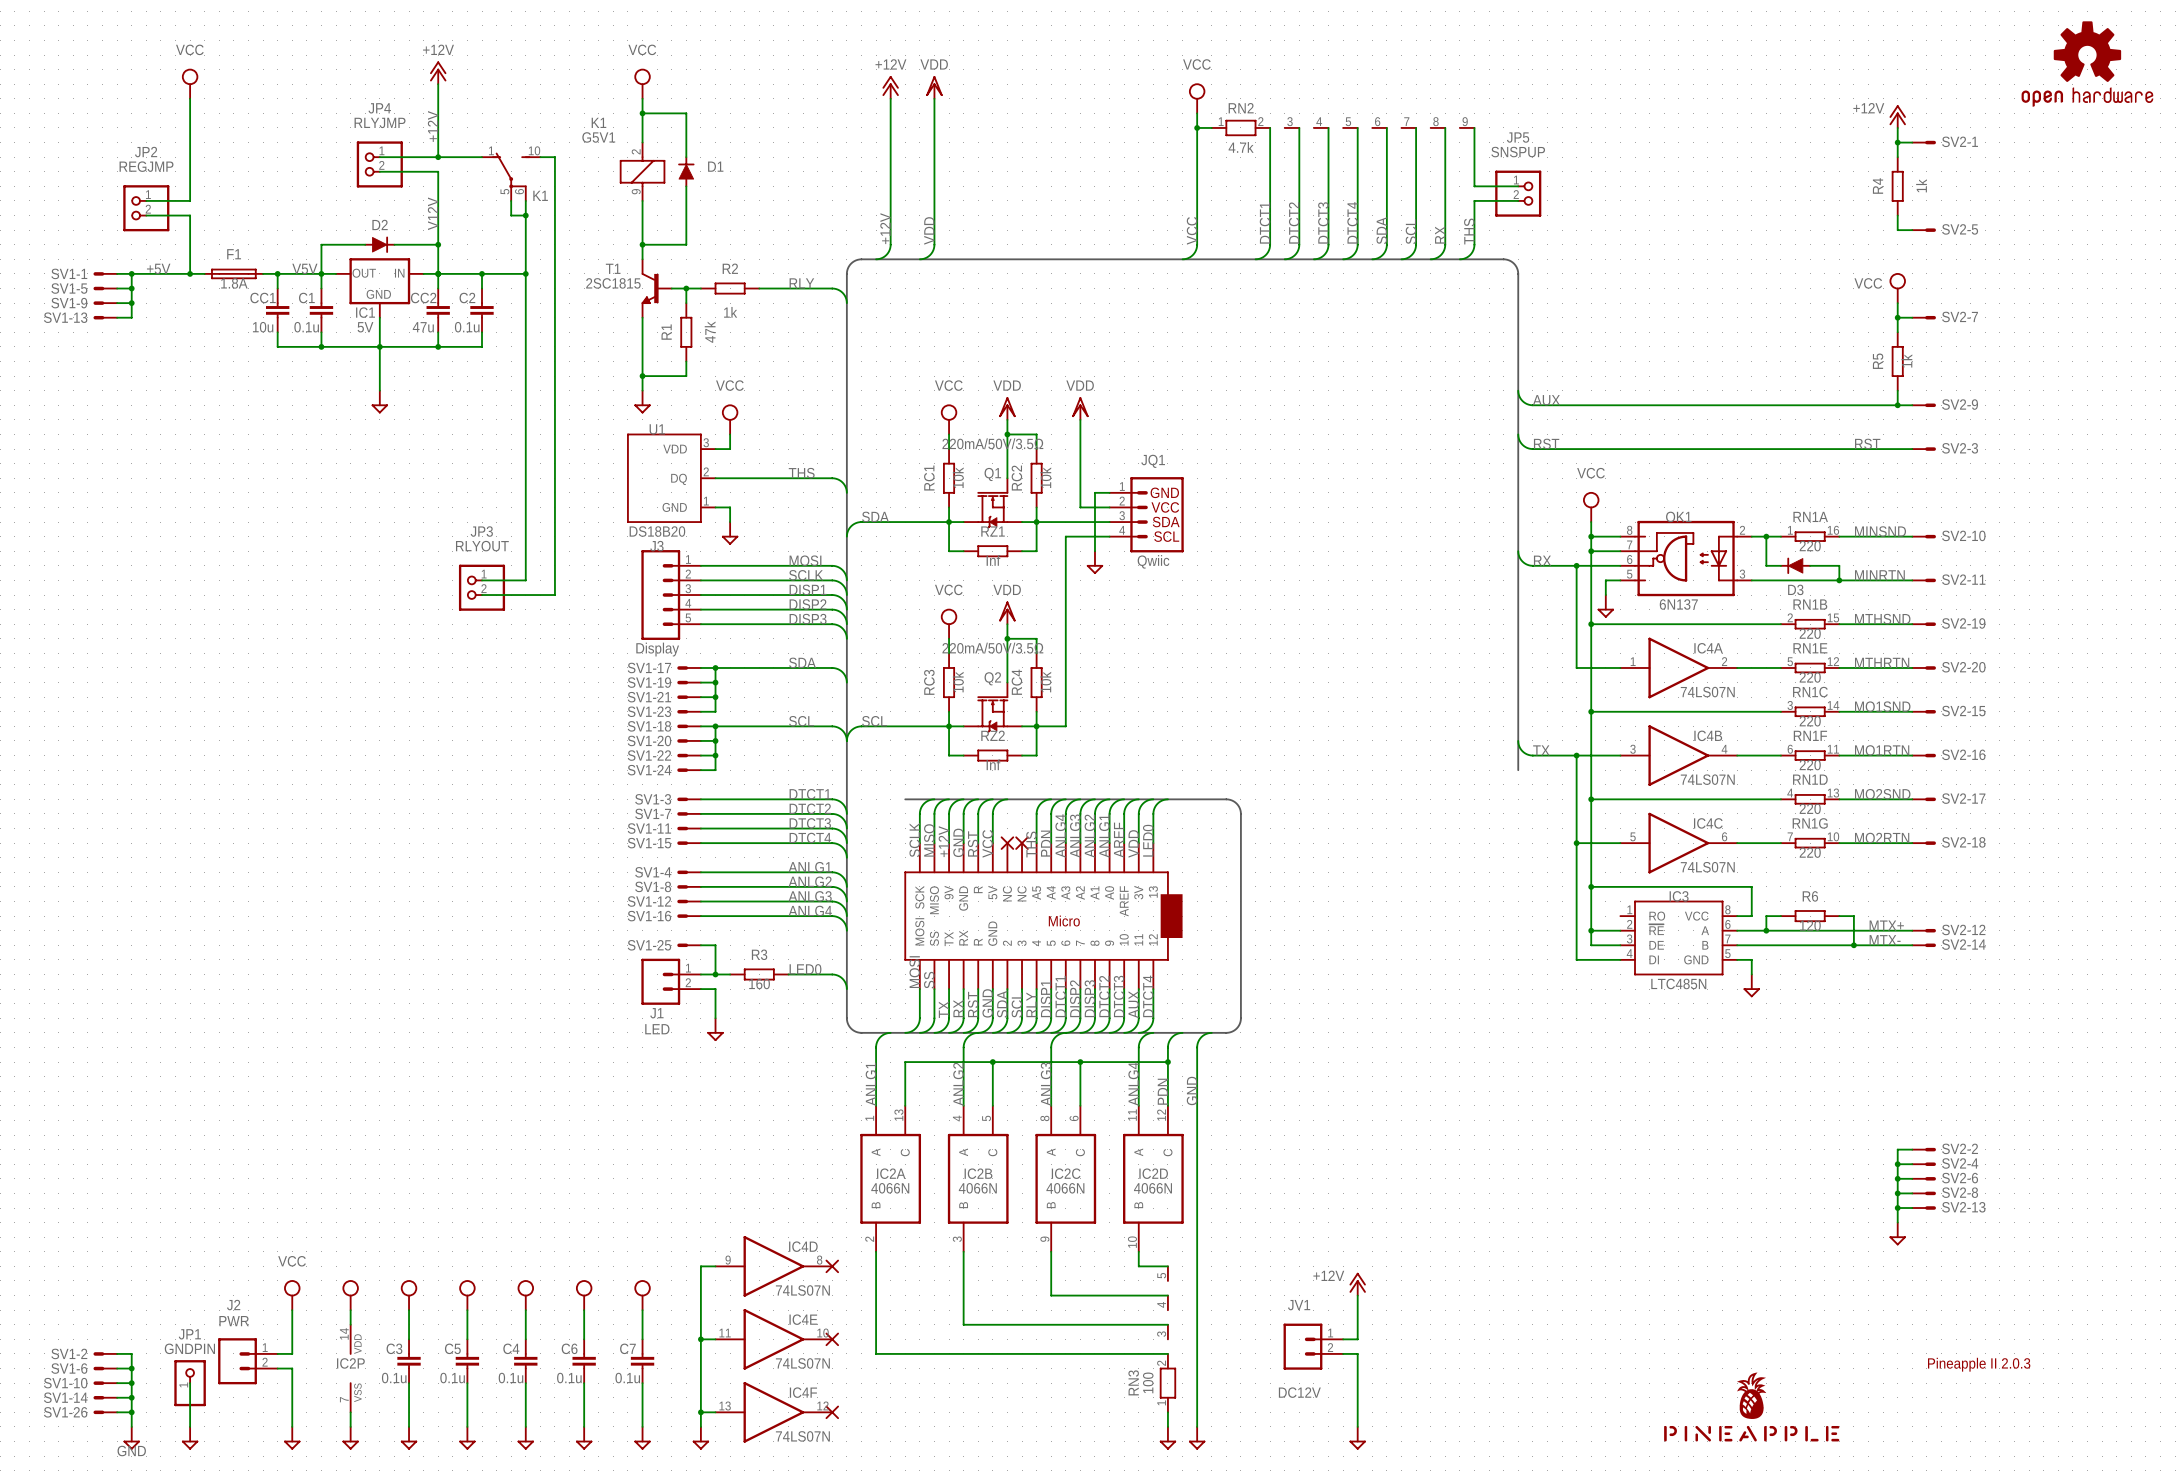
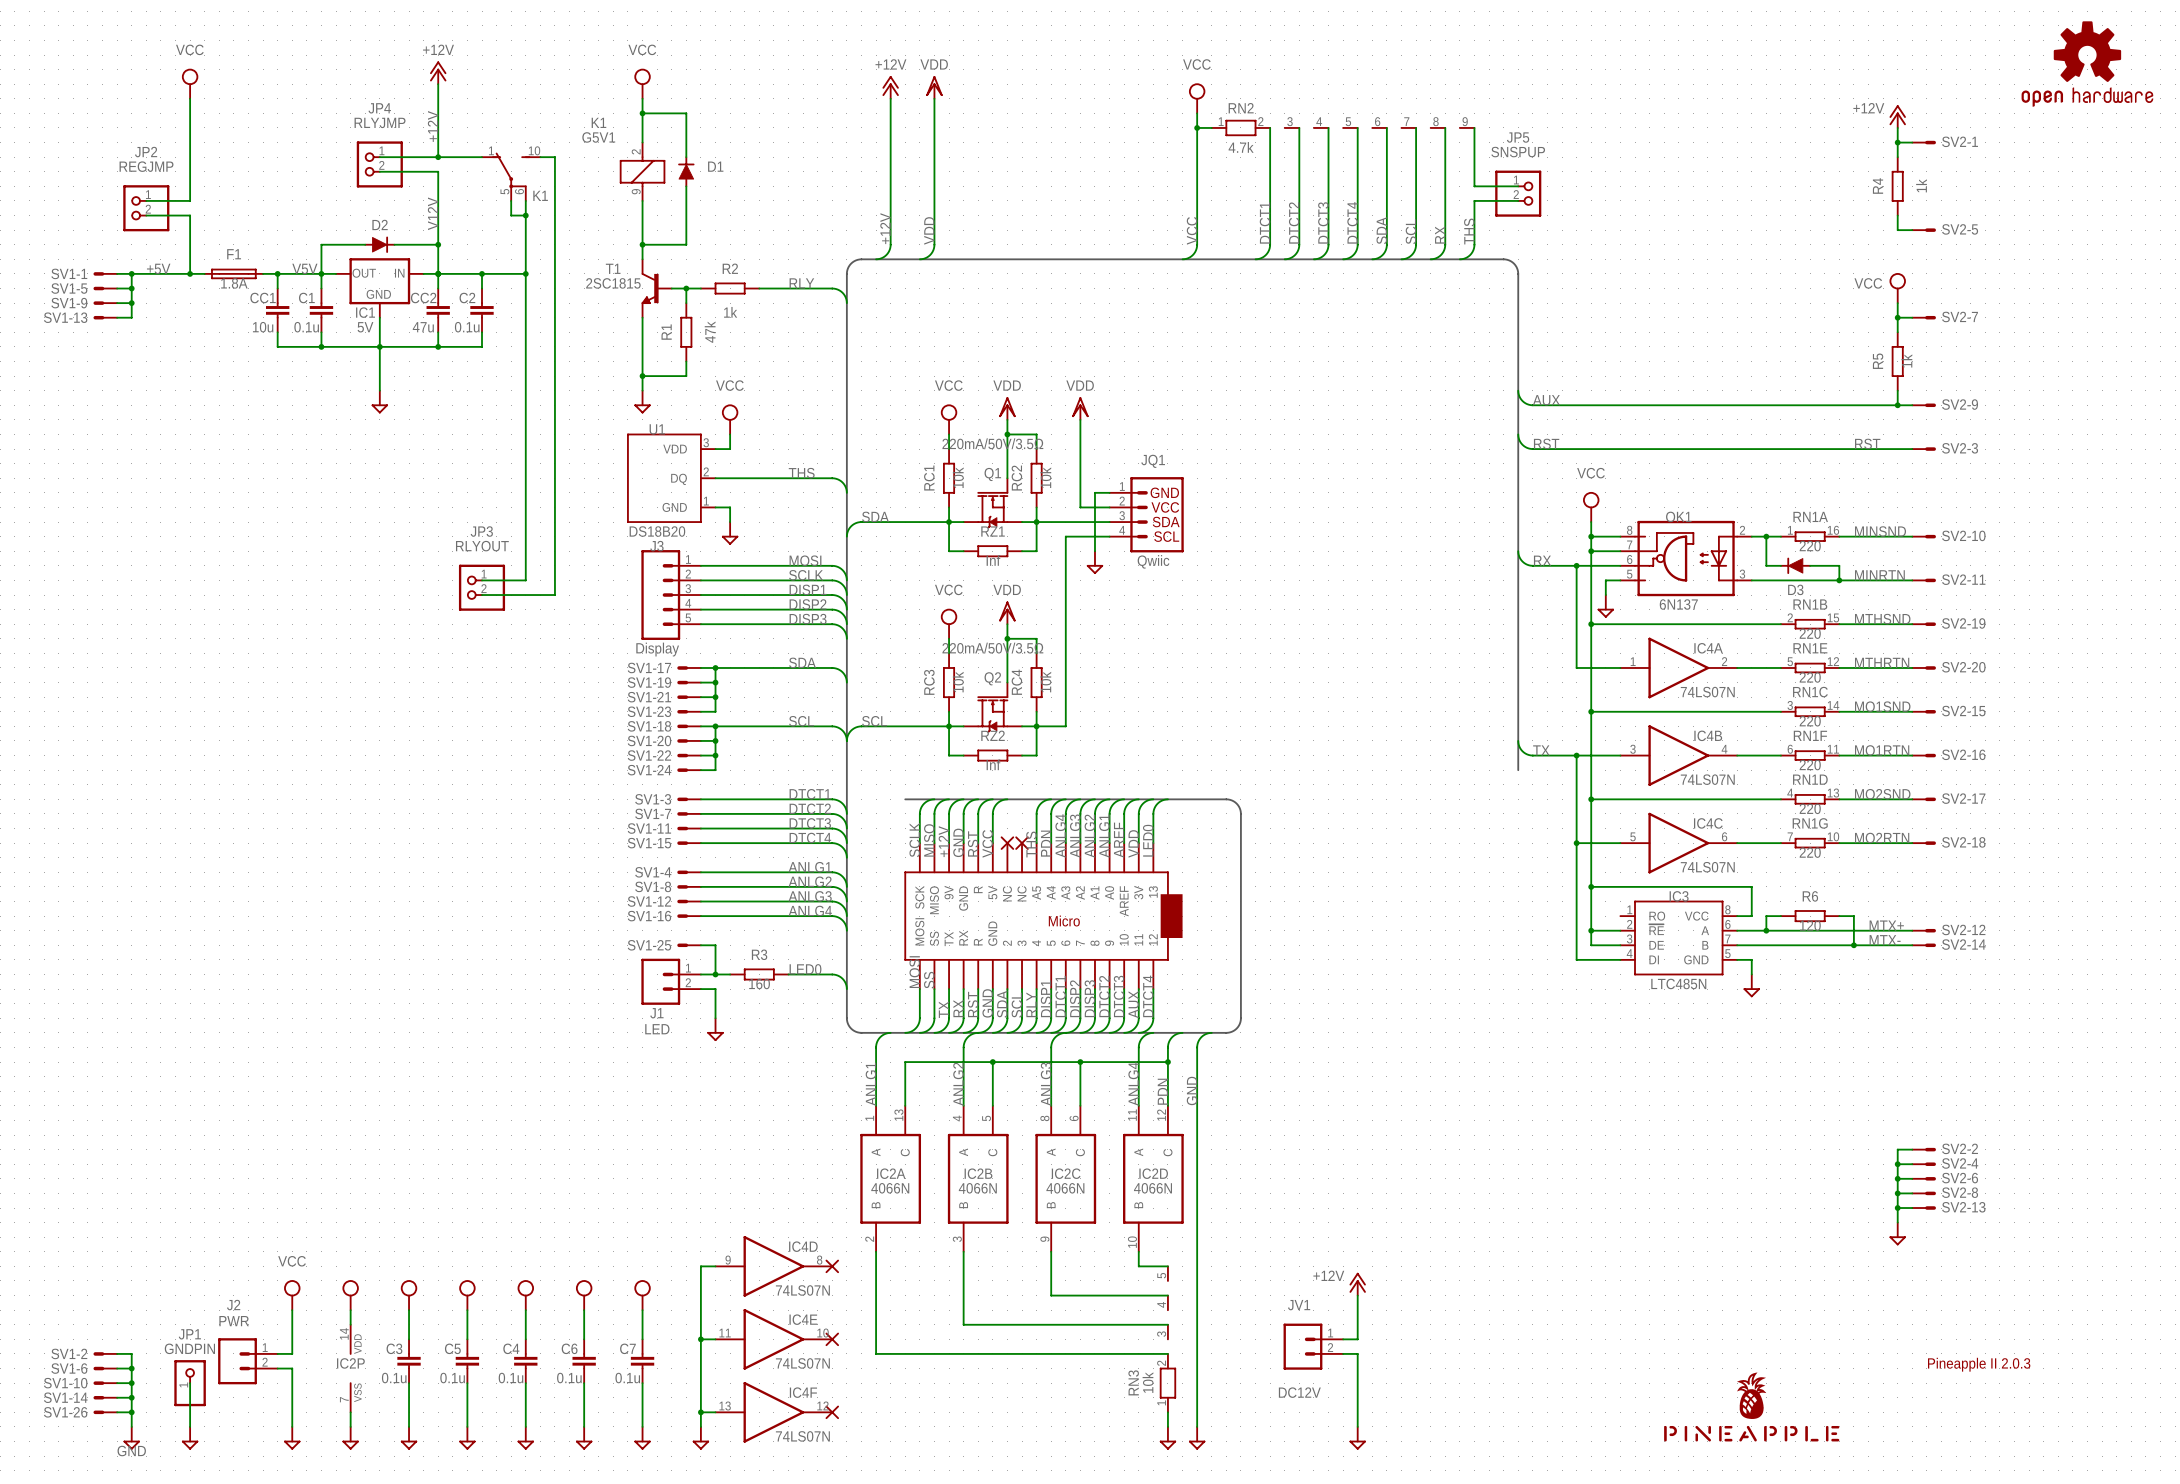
RN3 value: 100 (1148, 1382) -> 10k (1148, 1382)

